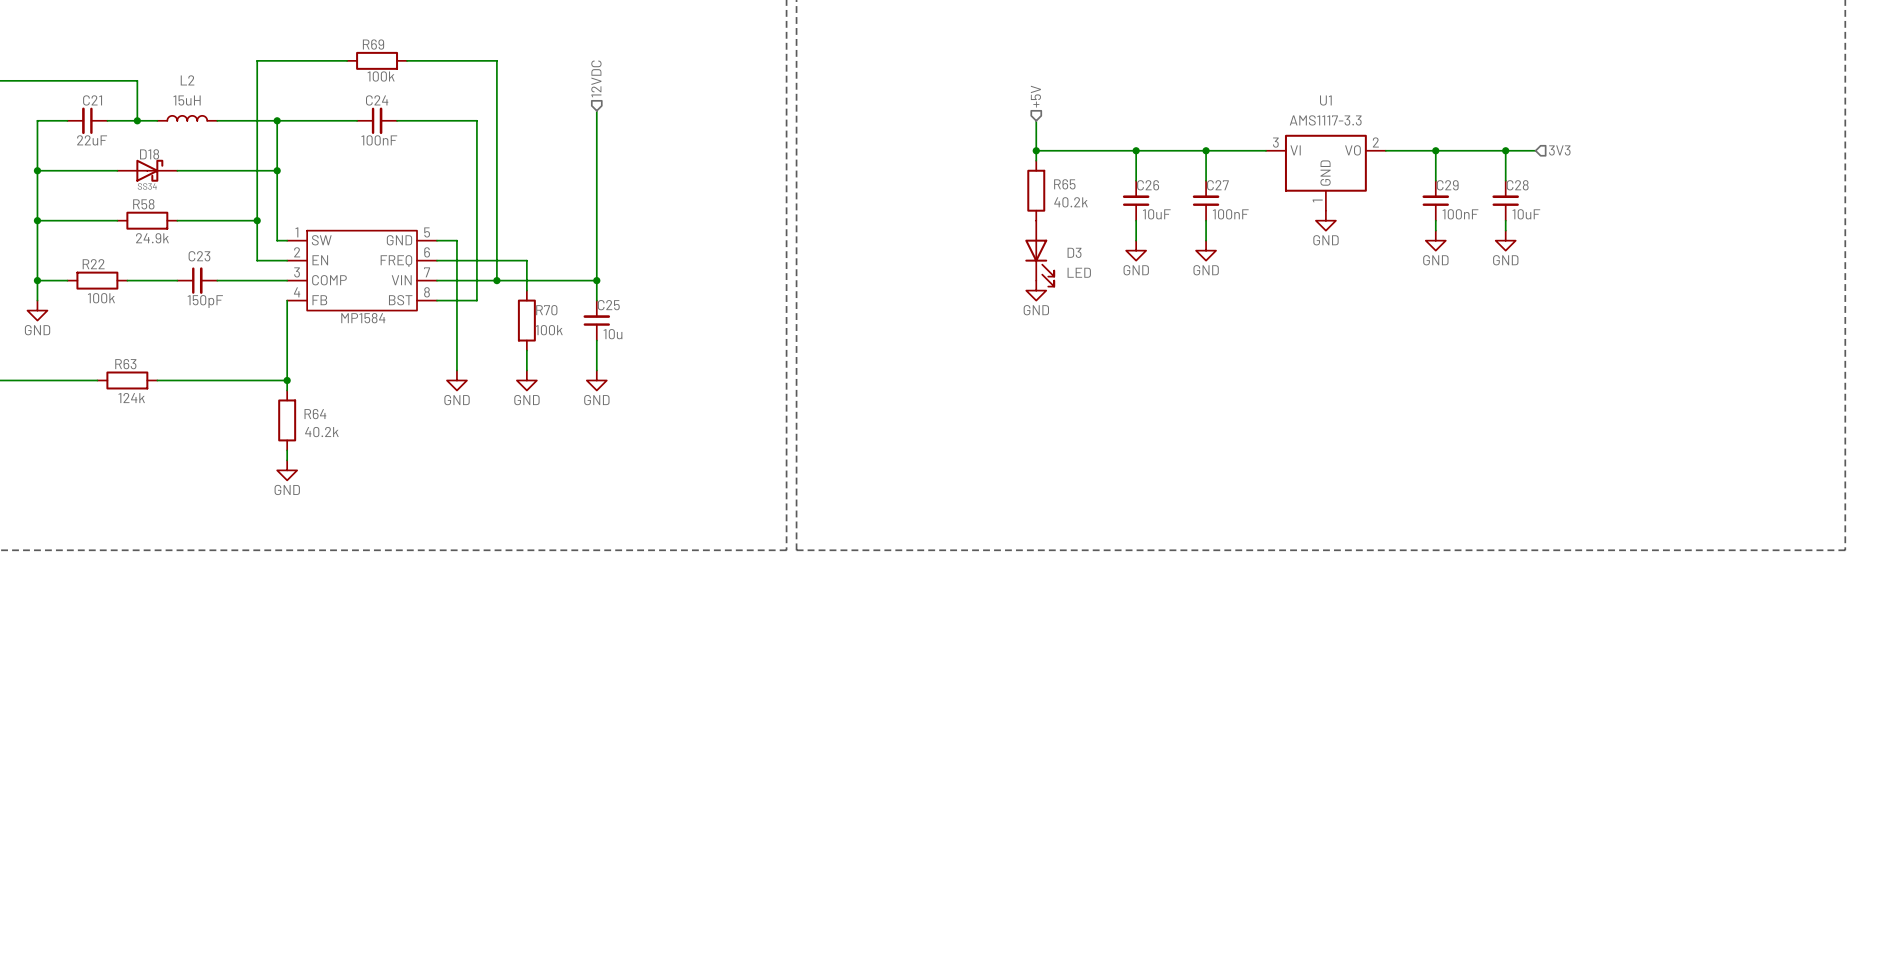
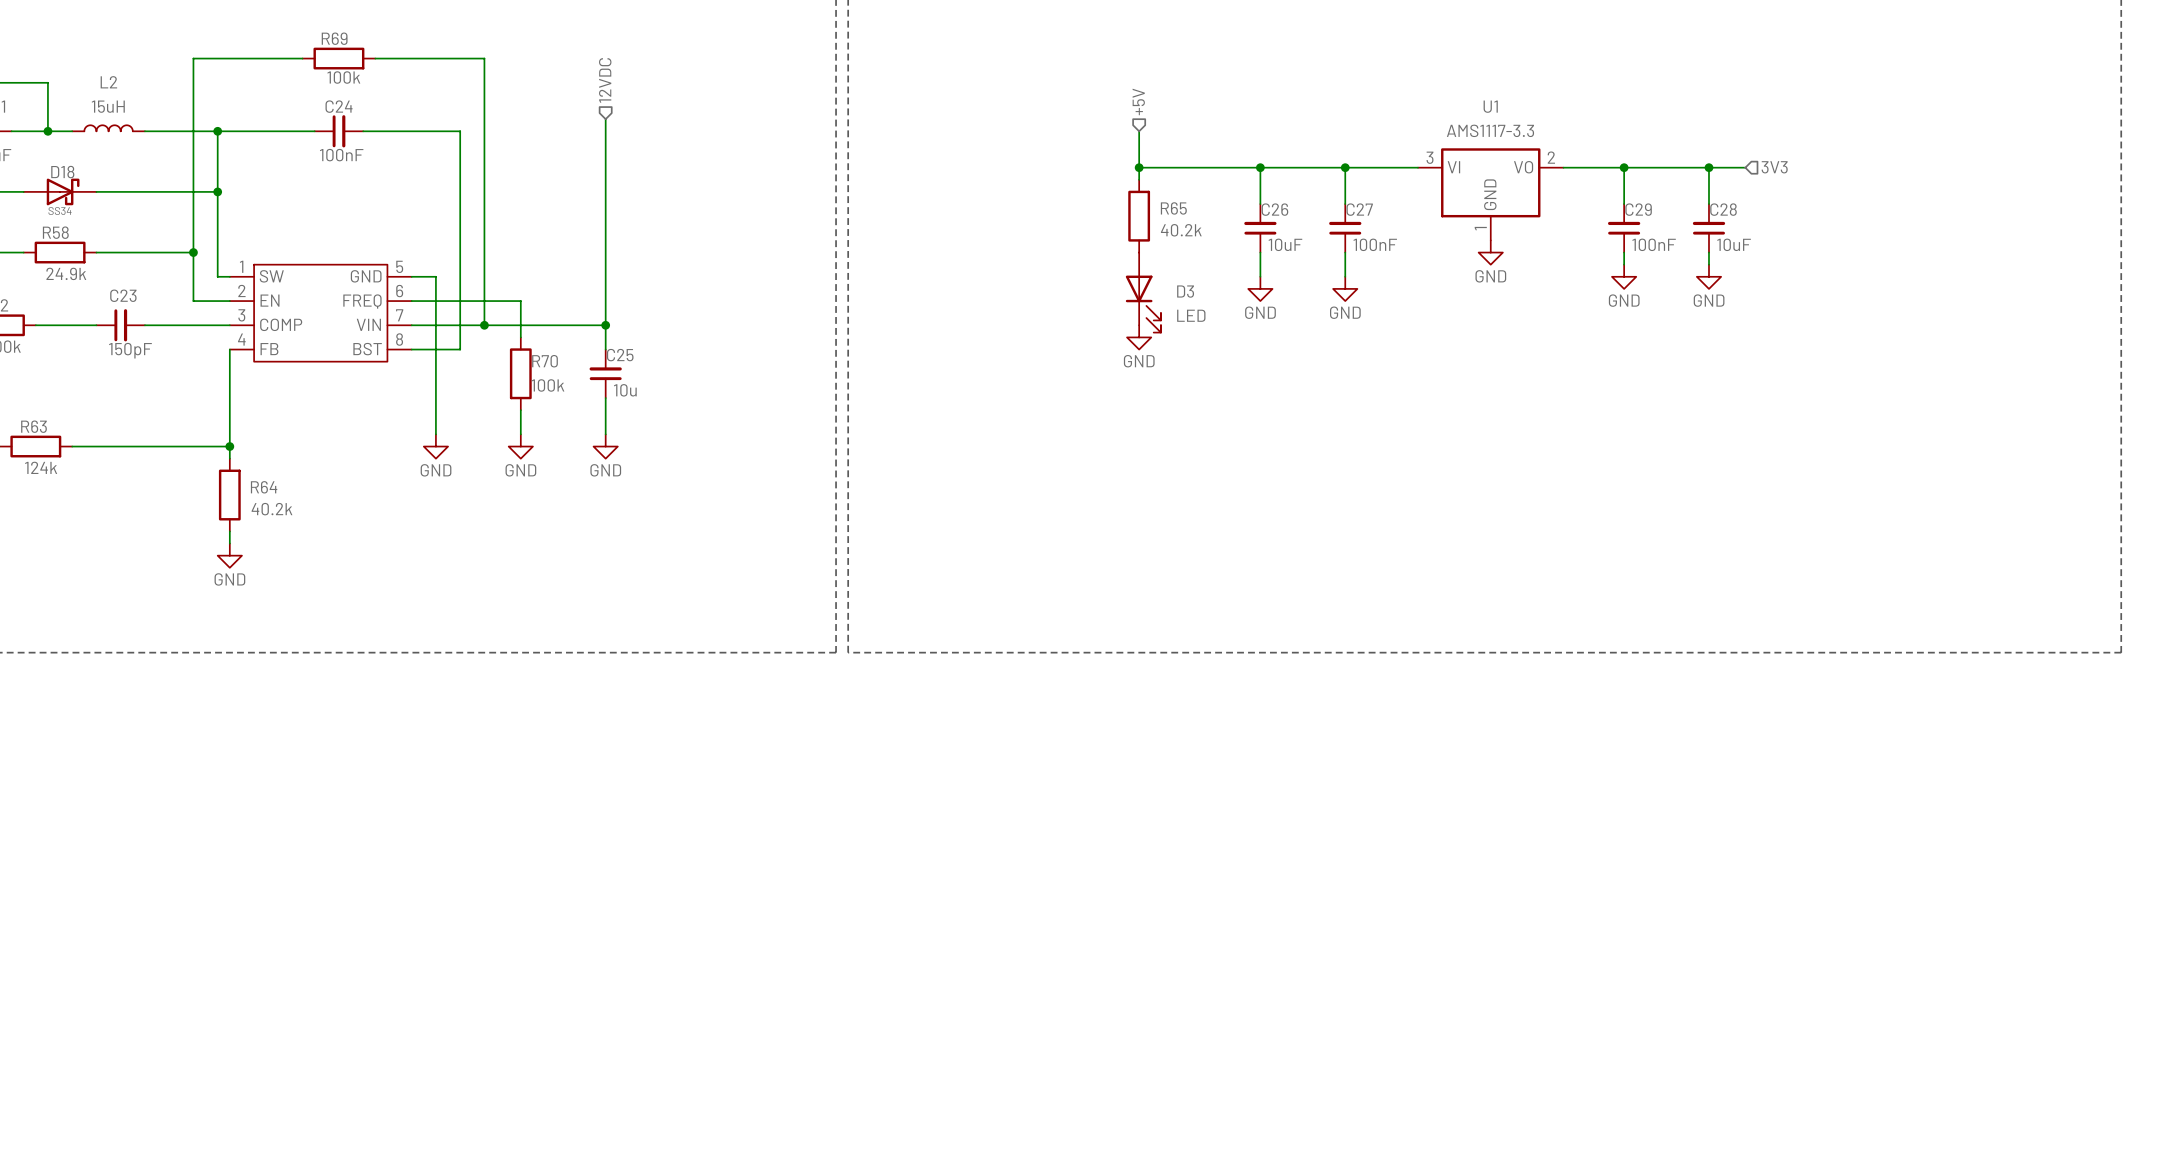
MP1584 name: MP1584 (363, 318) -> none

